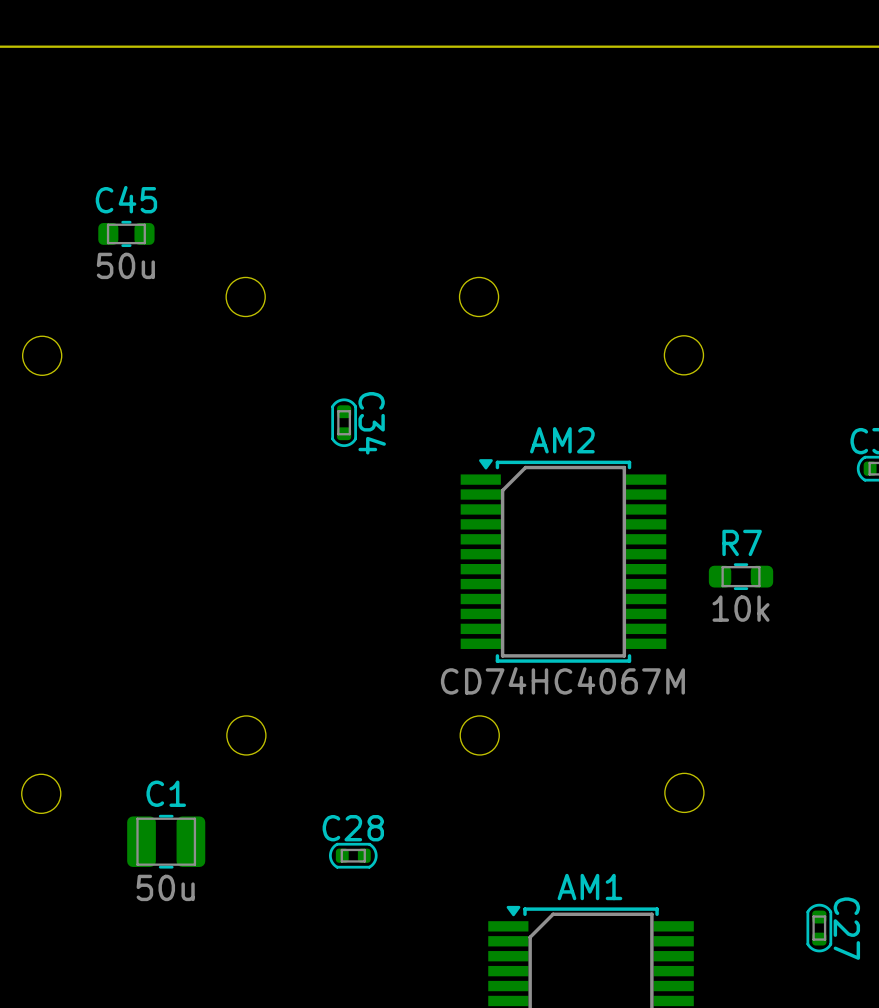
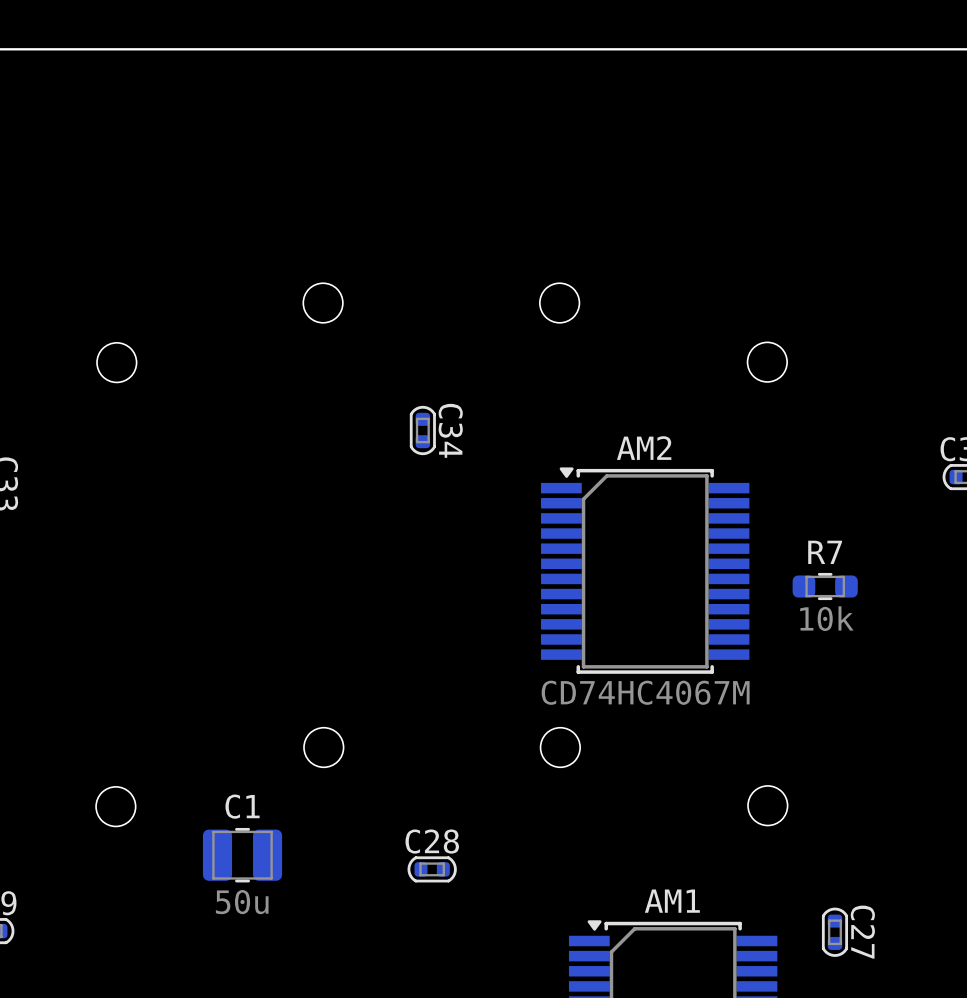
C45: 50u (126, 233) -> none
C27 position: (819, 928) -> (834, 932)

